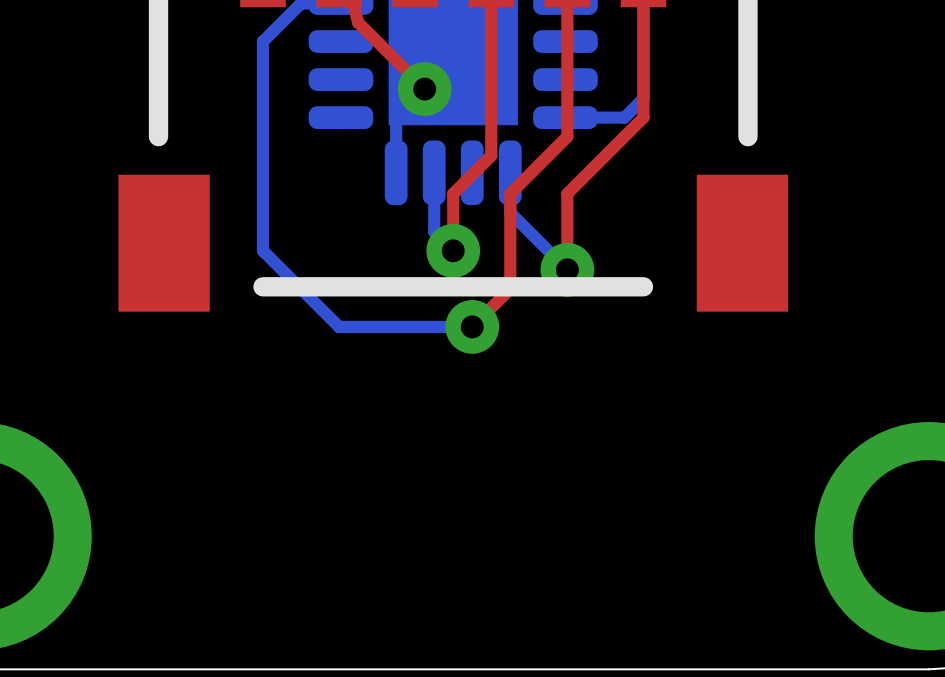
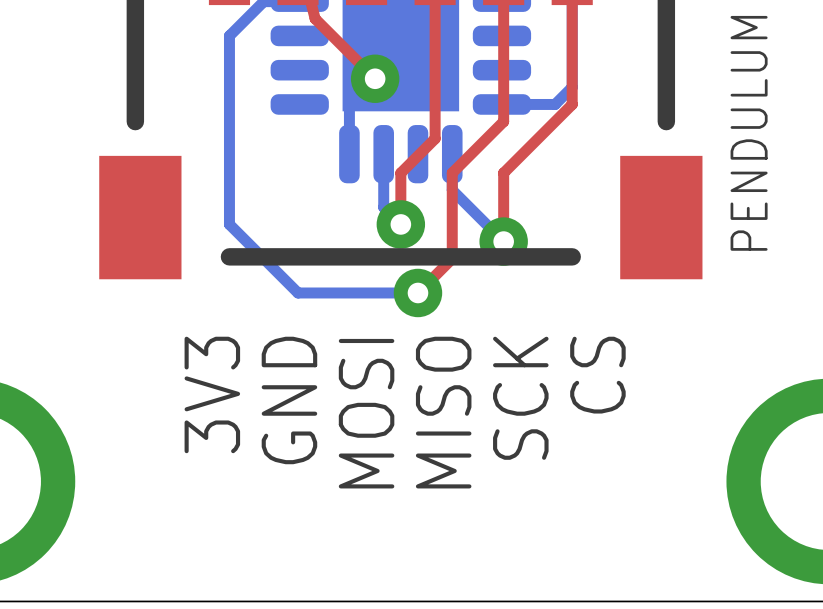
PENDULUM name: none -> PENDULUM (749, 133)
text: none -> CS (597, 375)
text: none -> SCK (520, 398)
text: none -> 3V3 (212, 394)
text: none -> GND (289, 400)
text: none -> MISO (443, 412)
text: none -> MOSI (366, 413)

